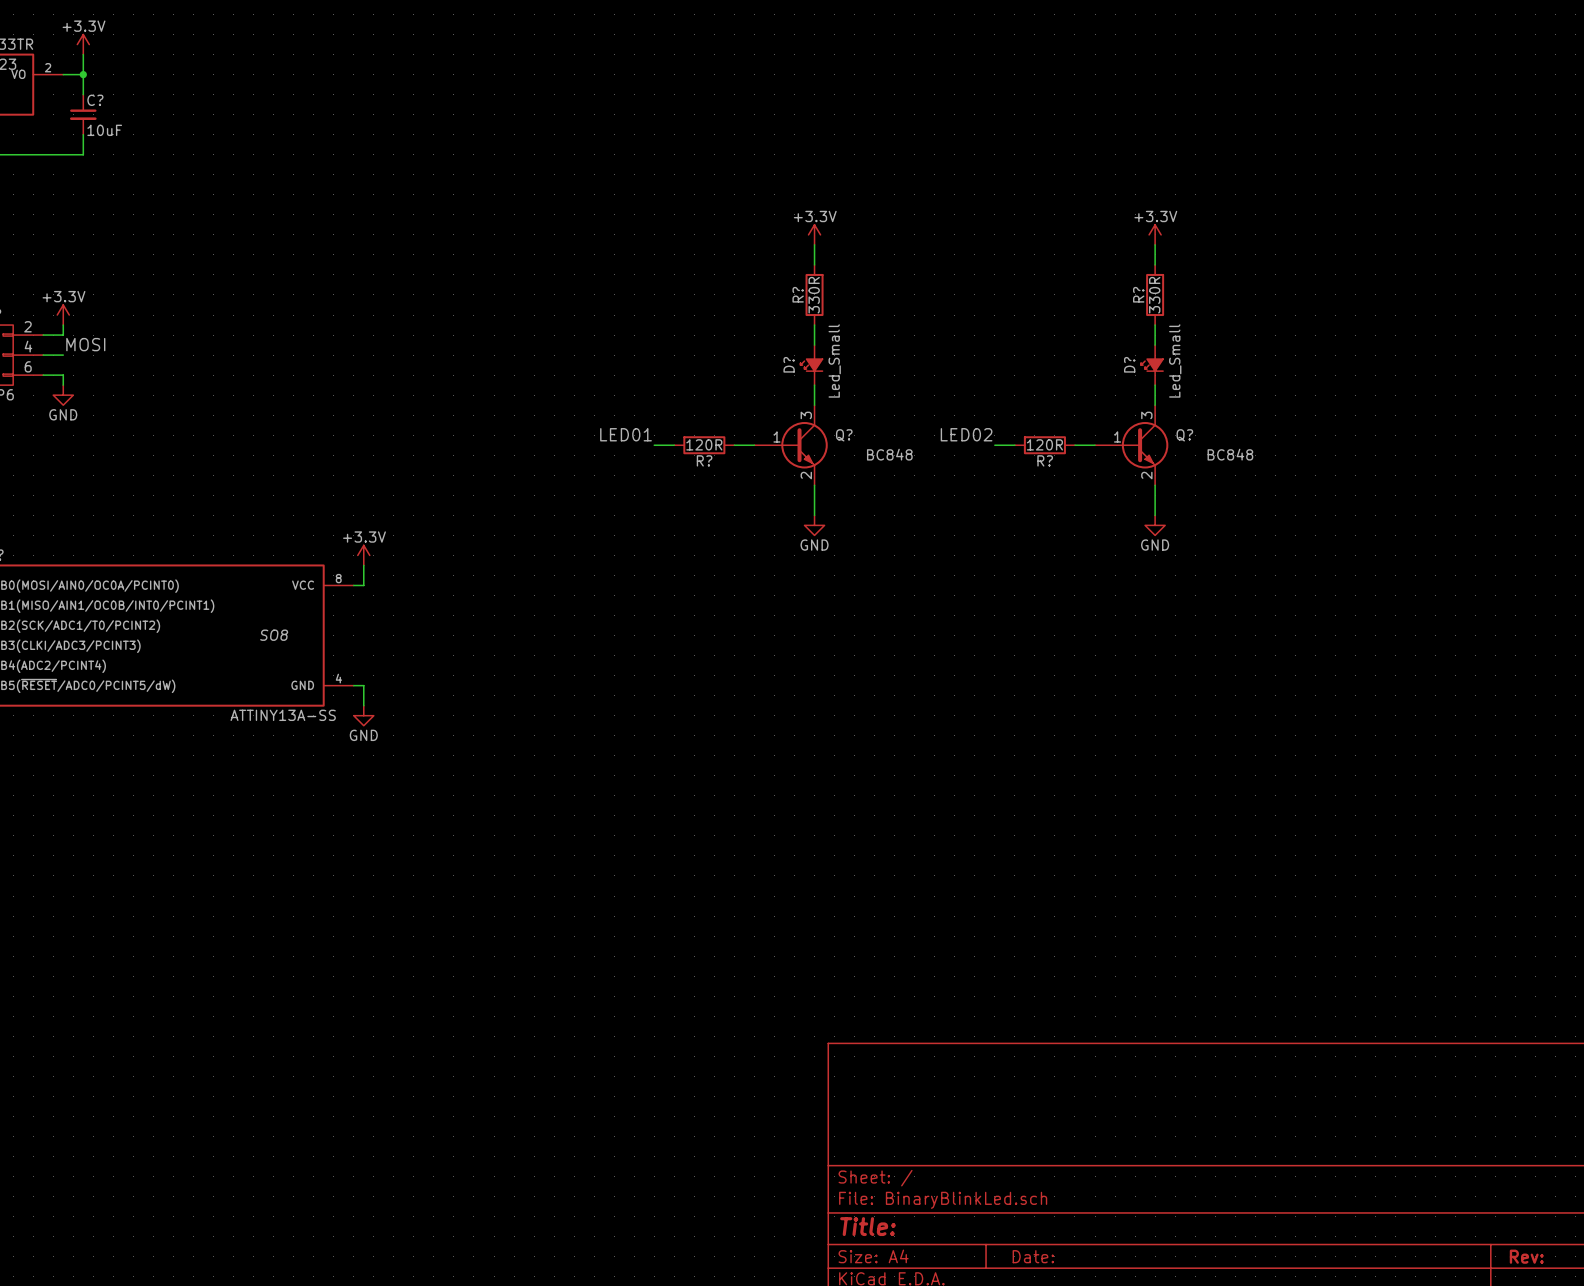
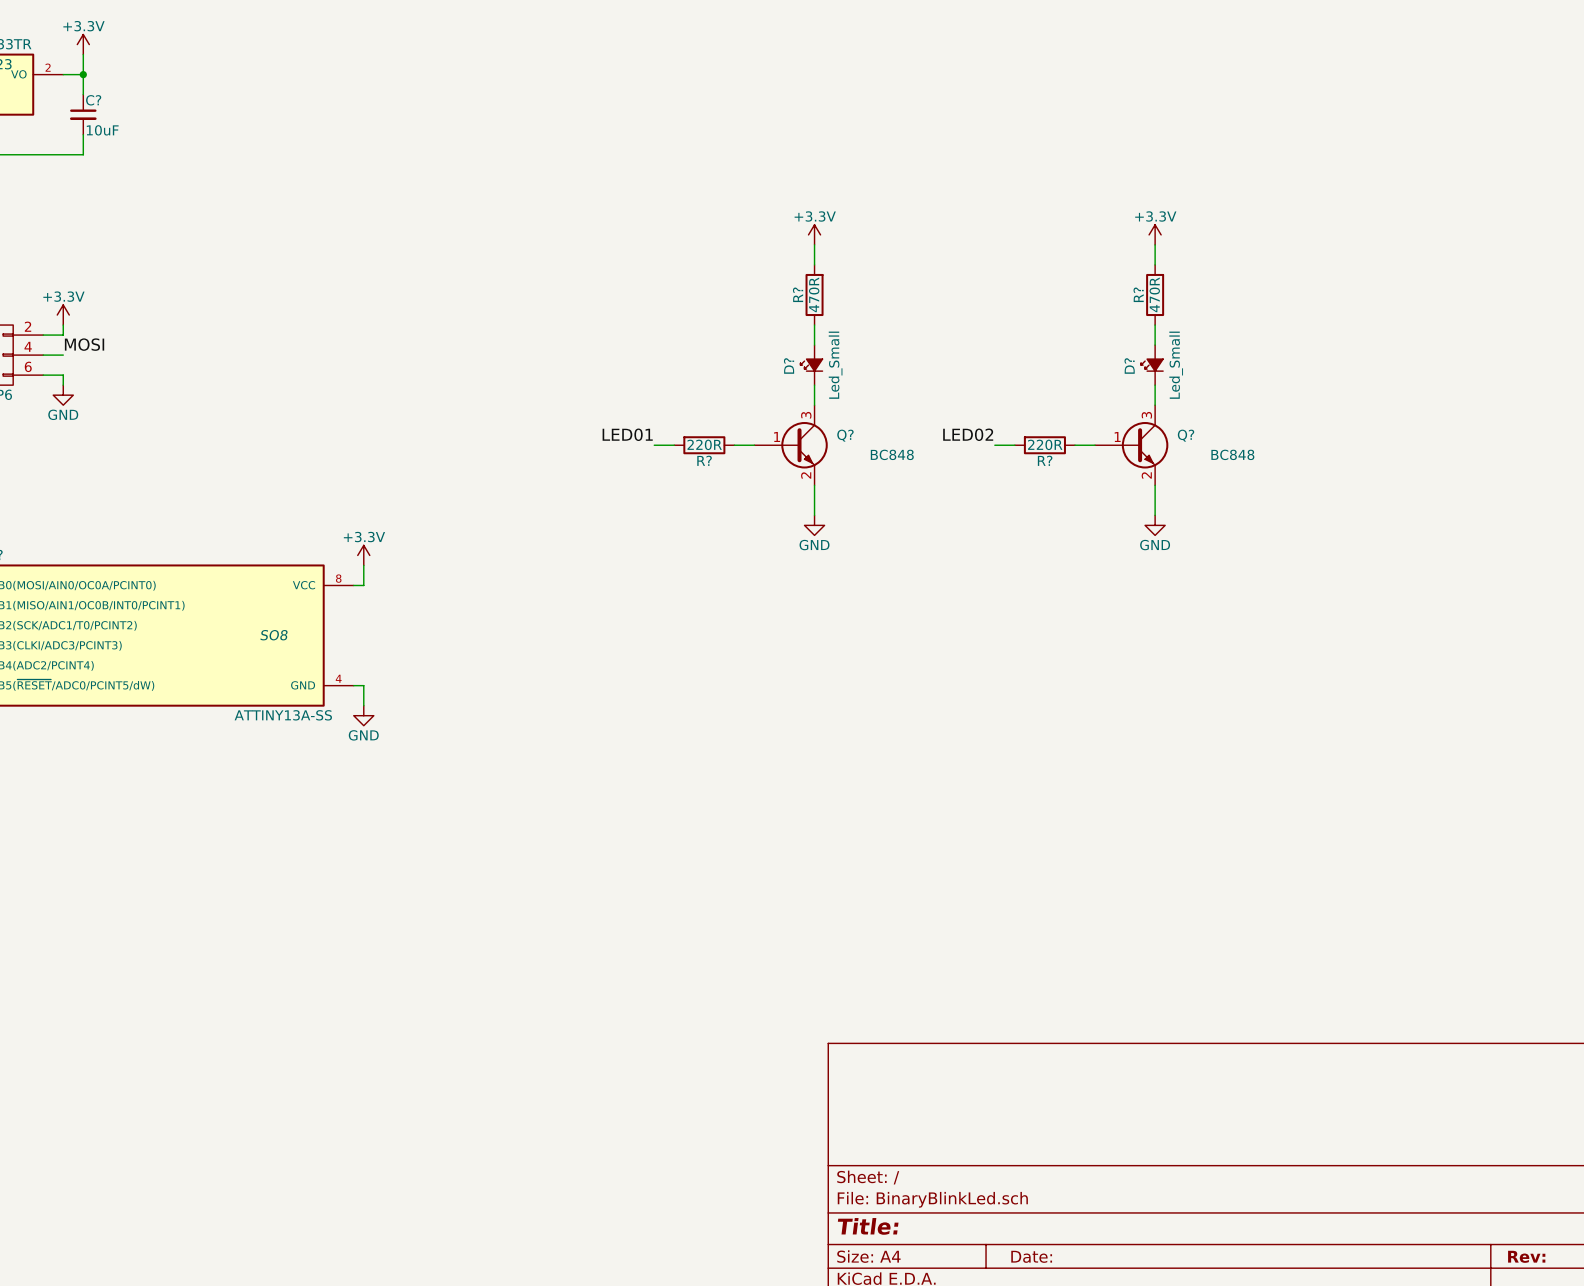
R? value: 330R (814, 295) -> 470R (814, 294)
R? value: 330R (1154, 295) -> 470R (1154, 294)
R? value: 120R (704, 444) -> 220R (704, 444)
R? value: 120R (1044, 444) -> 220R (1045, 444)

